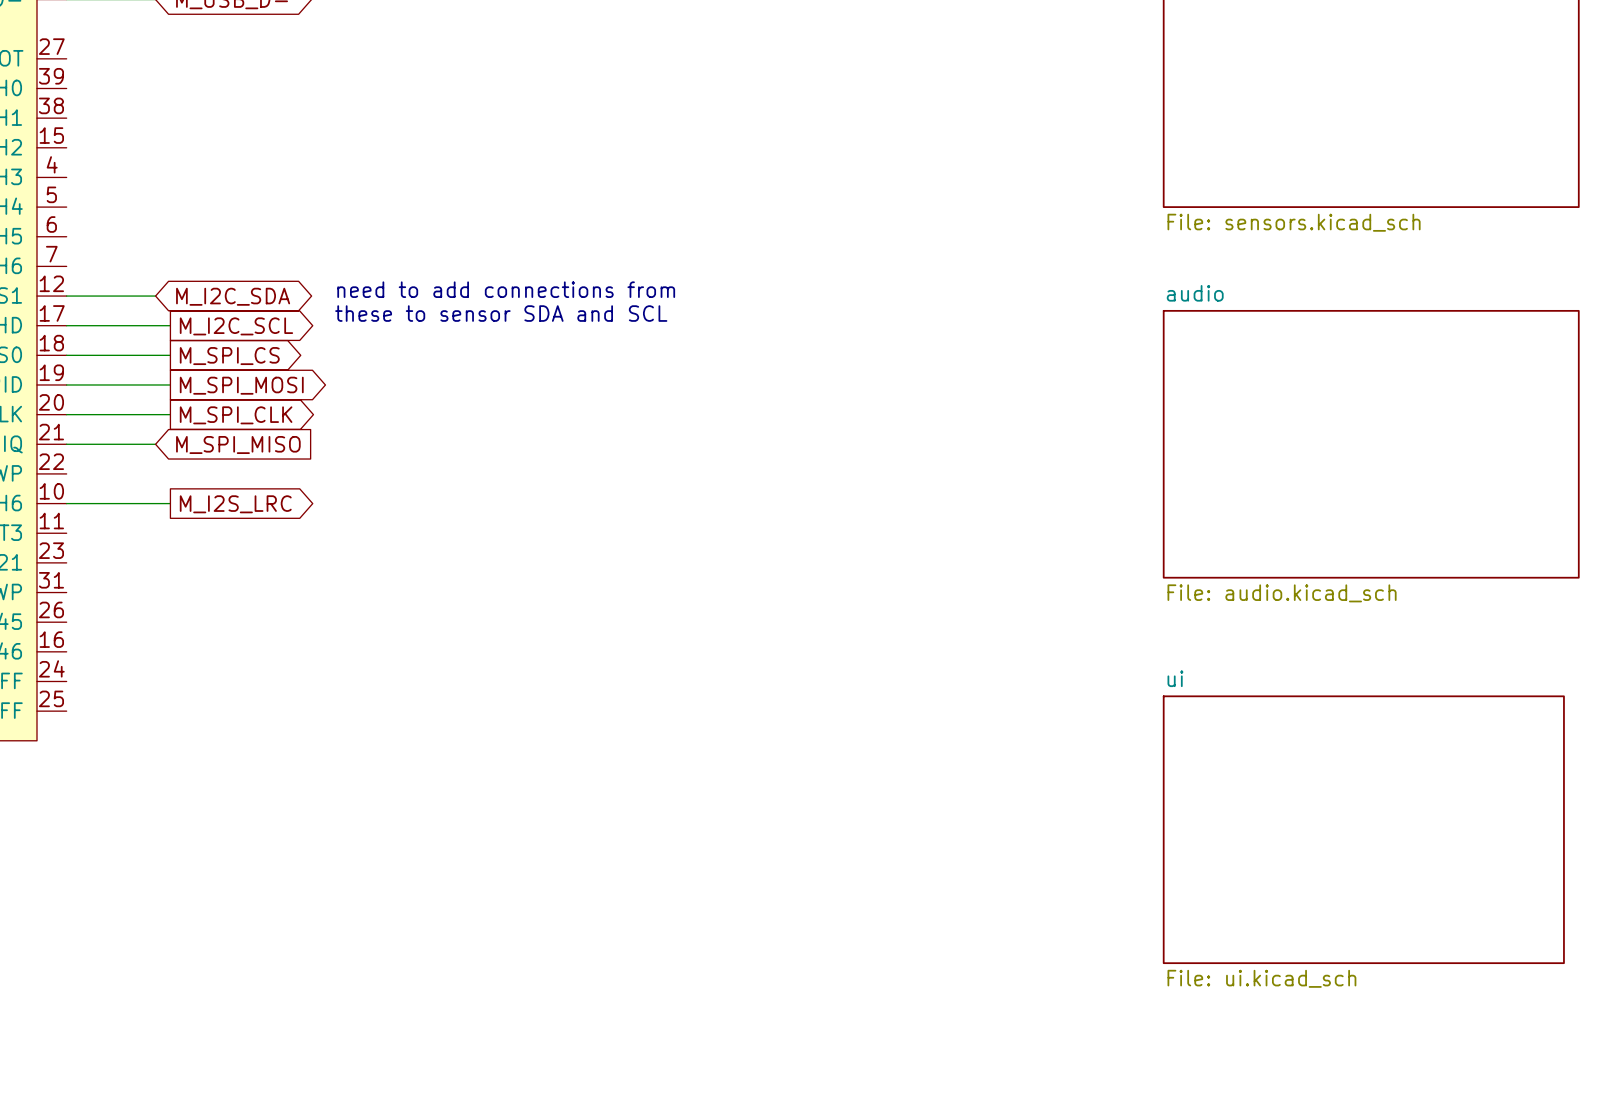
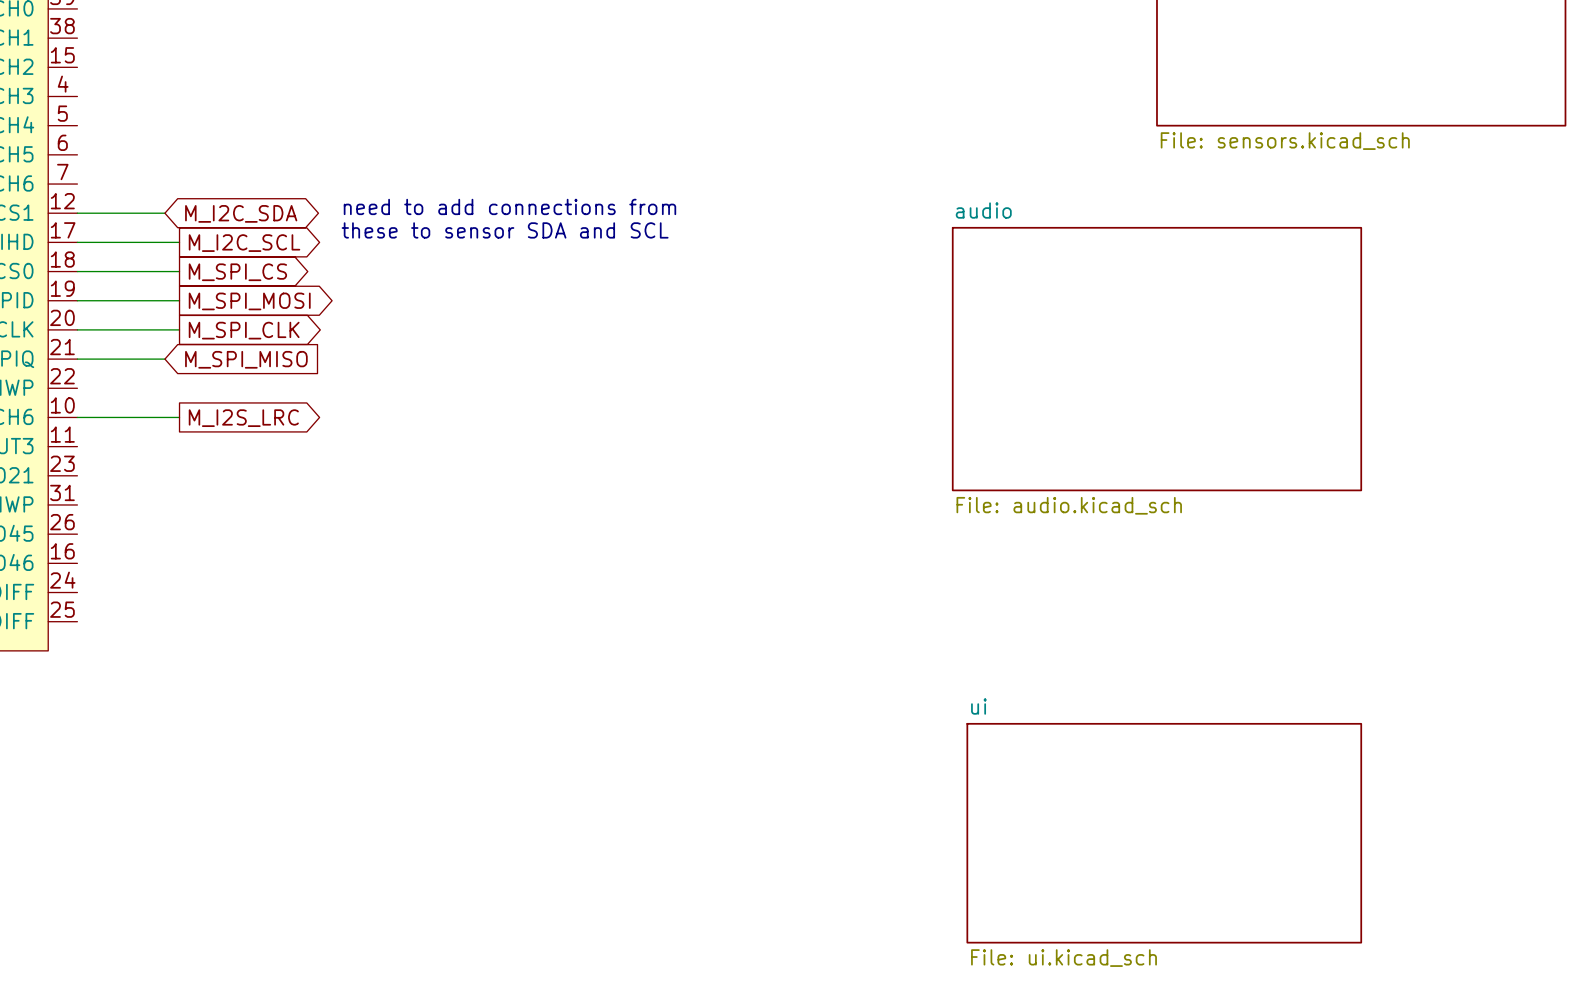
sheet audio position: (1371, 444) -> (1156, 359)
sheet ui: File: ui.kicad_sch (1363, 829) -> none
sheet ui: none -> File: ui.kicad_sch (1164, 833)

